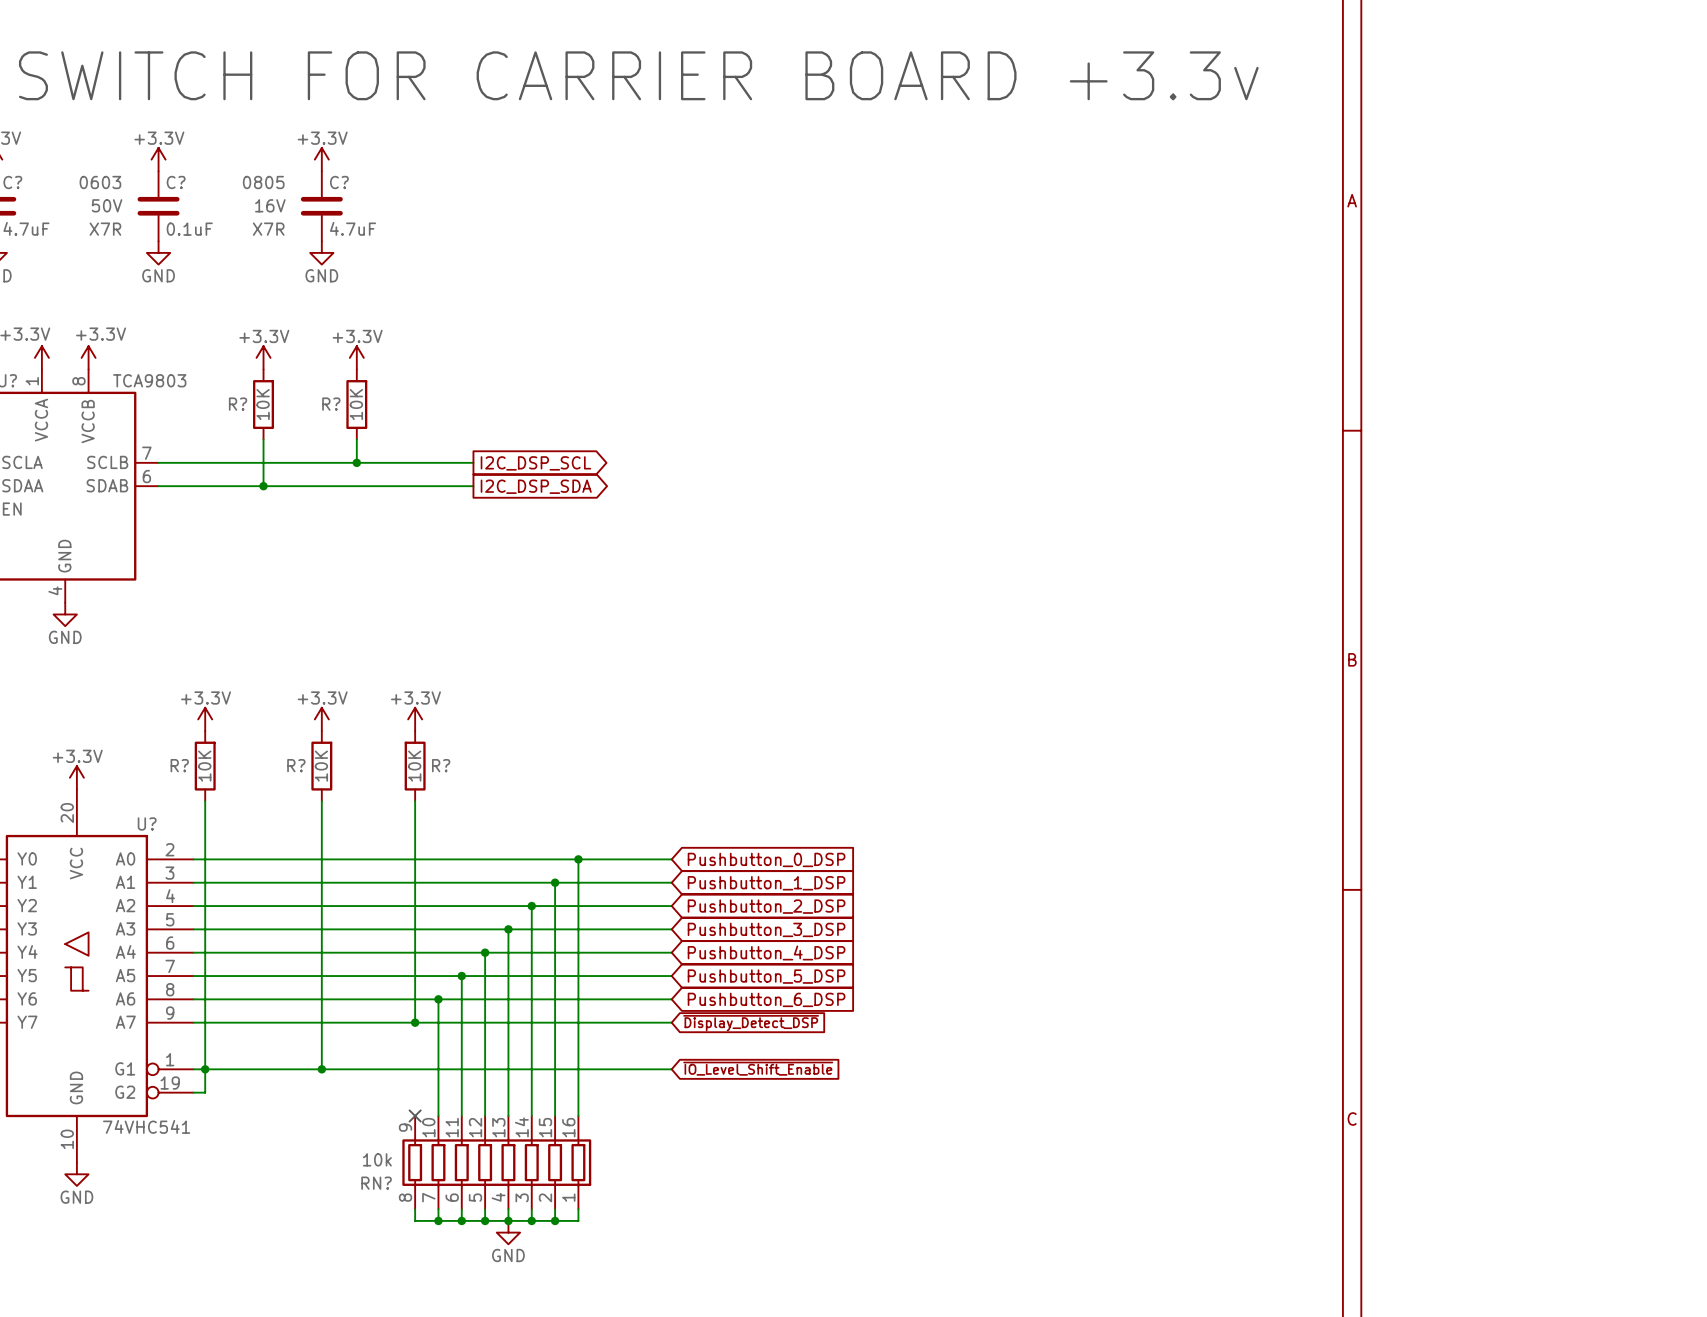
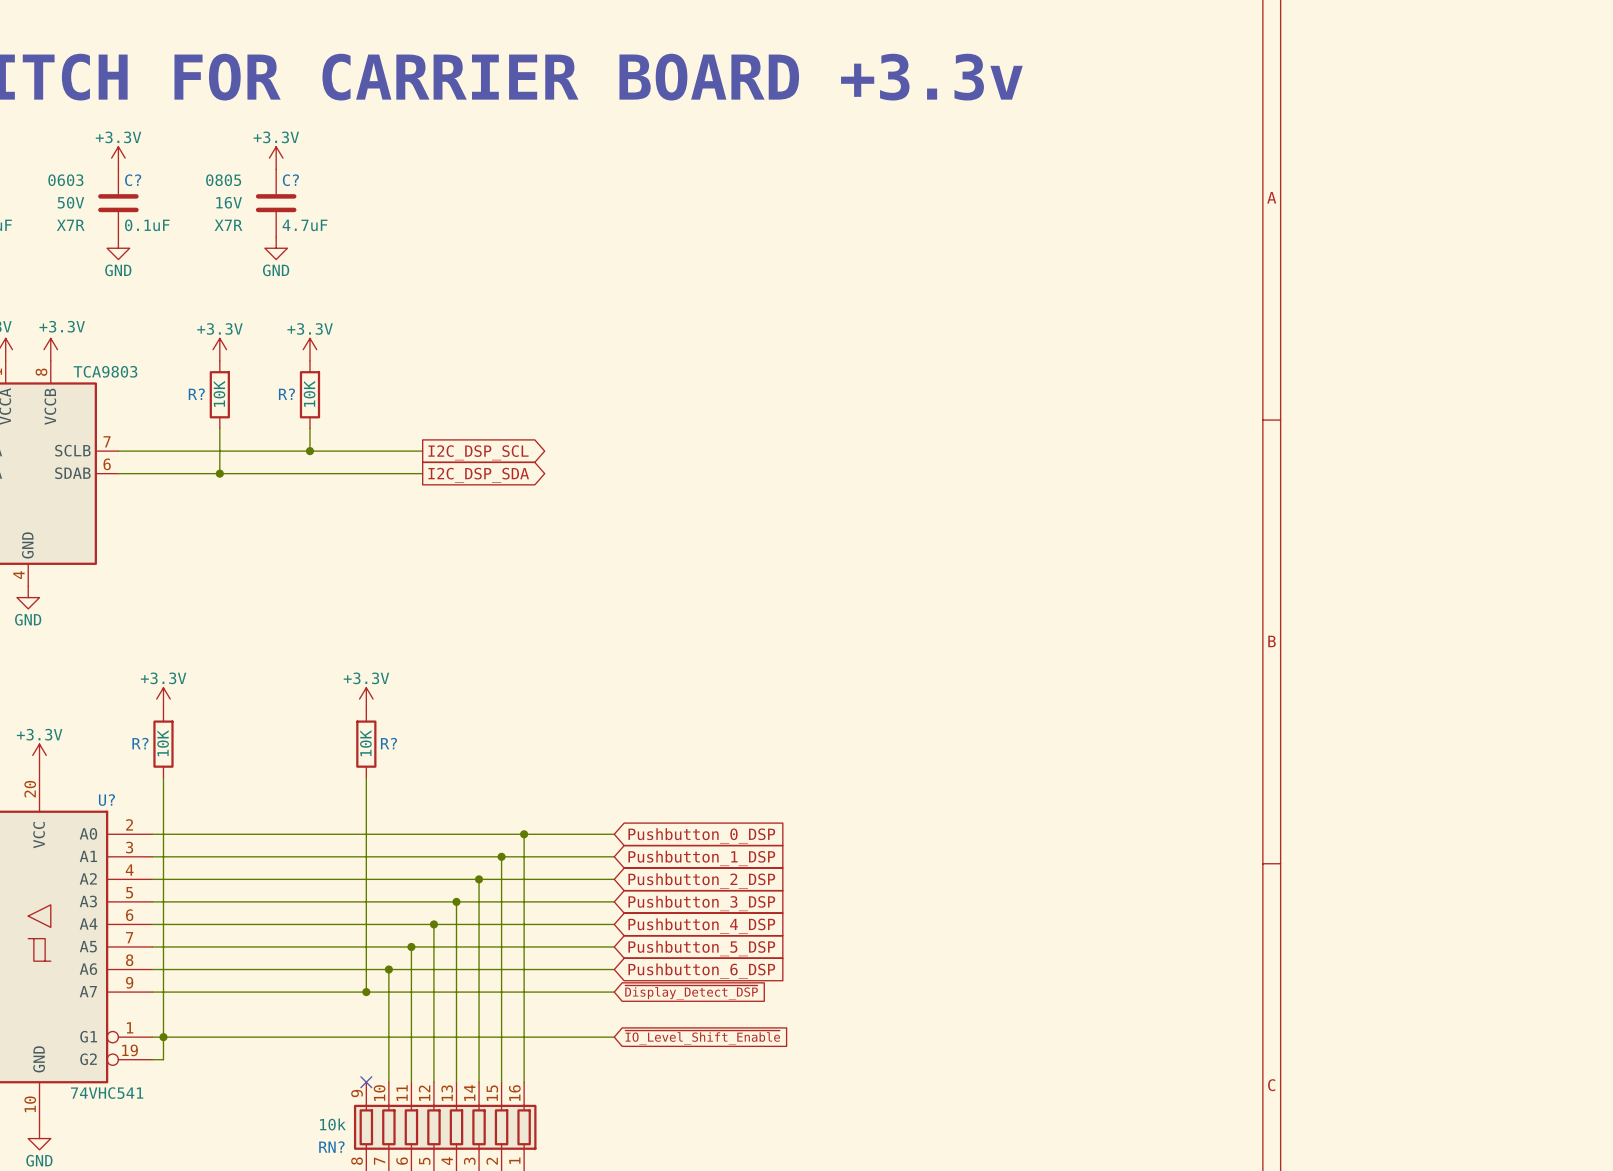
power symbol: +3.3V (321, 719) -> none
R?: 10K (321, 766) -> none
wire: (321, 801) (321, 1069) -> none
junction: (321, 1069) -> none

